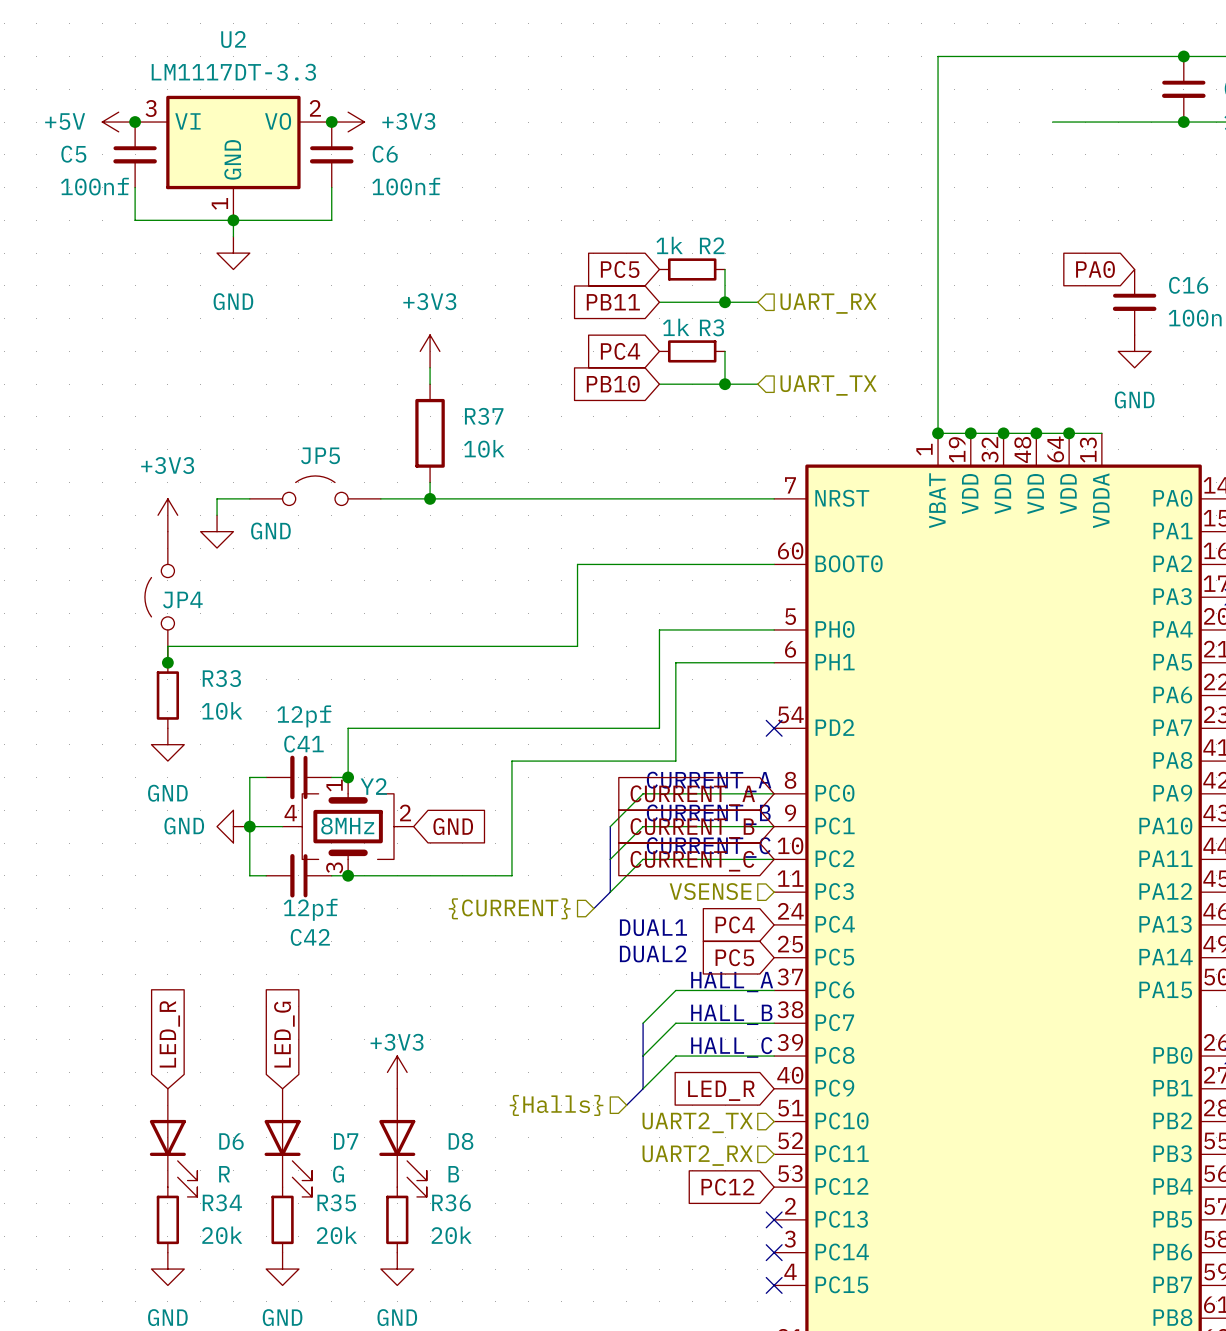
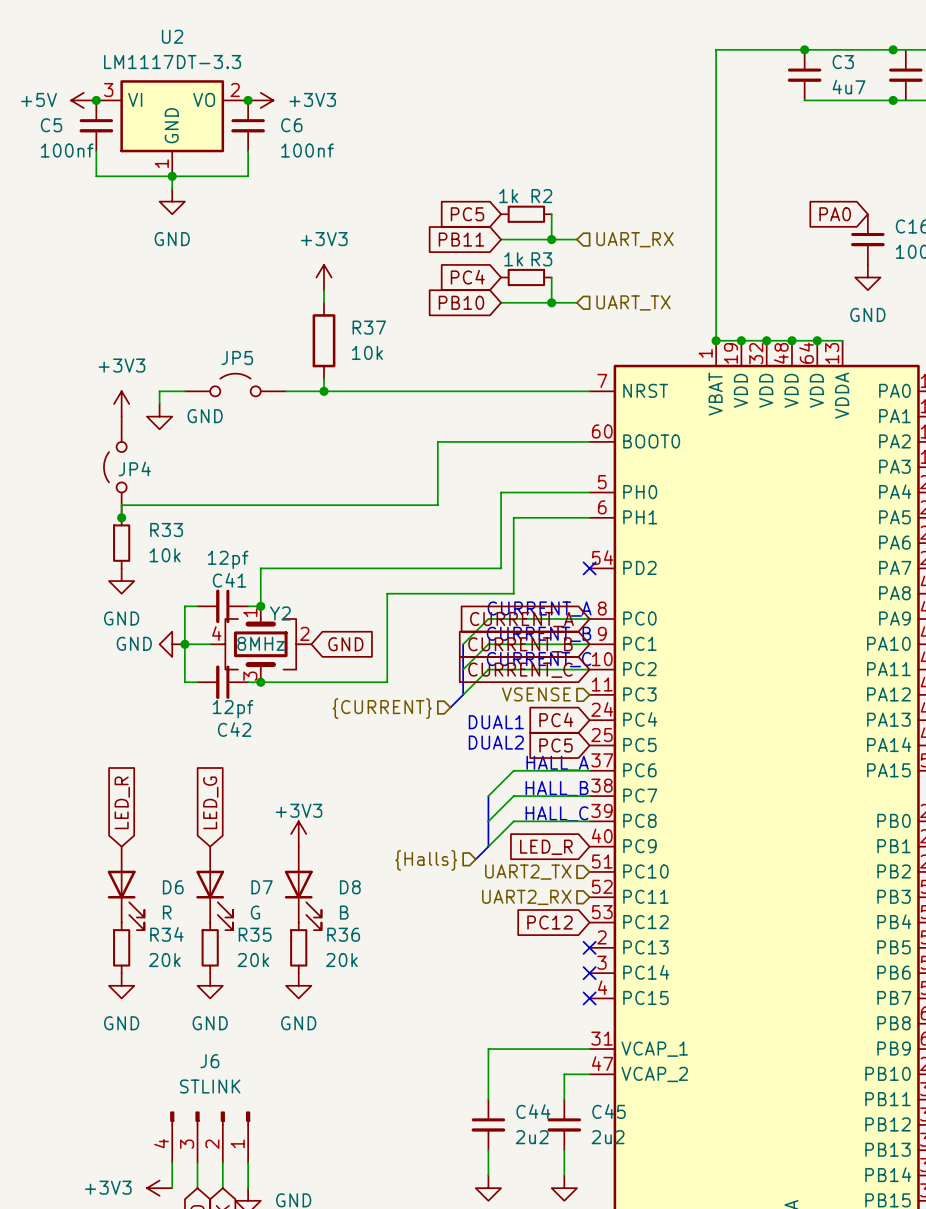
junction: none -> (804, 49)
junction position: (1183, 56) -> (893, 49)
C3: none -> 4u7 (804, 75)
junction position: (1183, 122) -> (893, 100)

